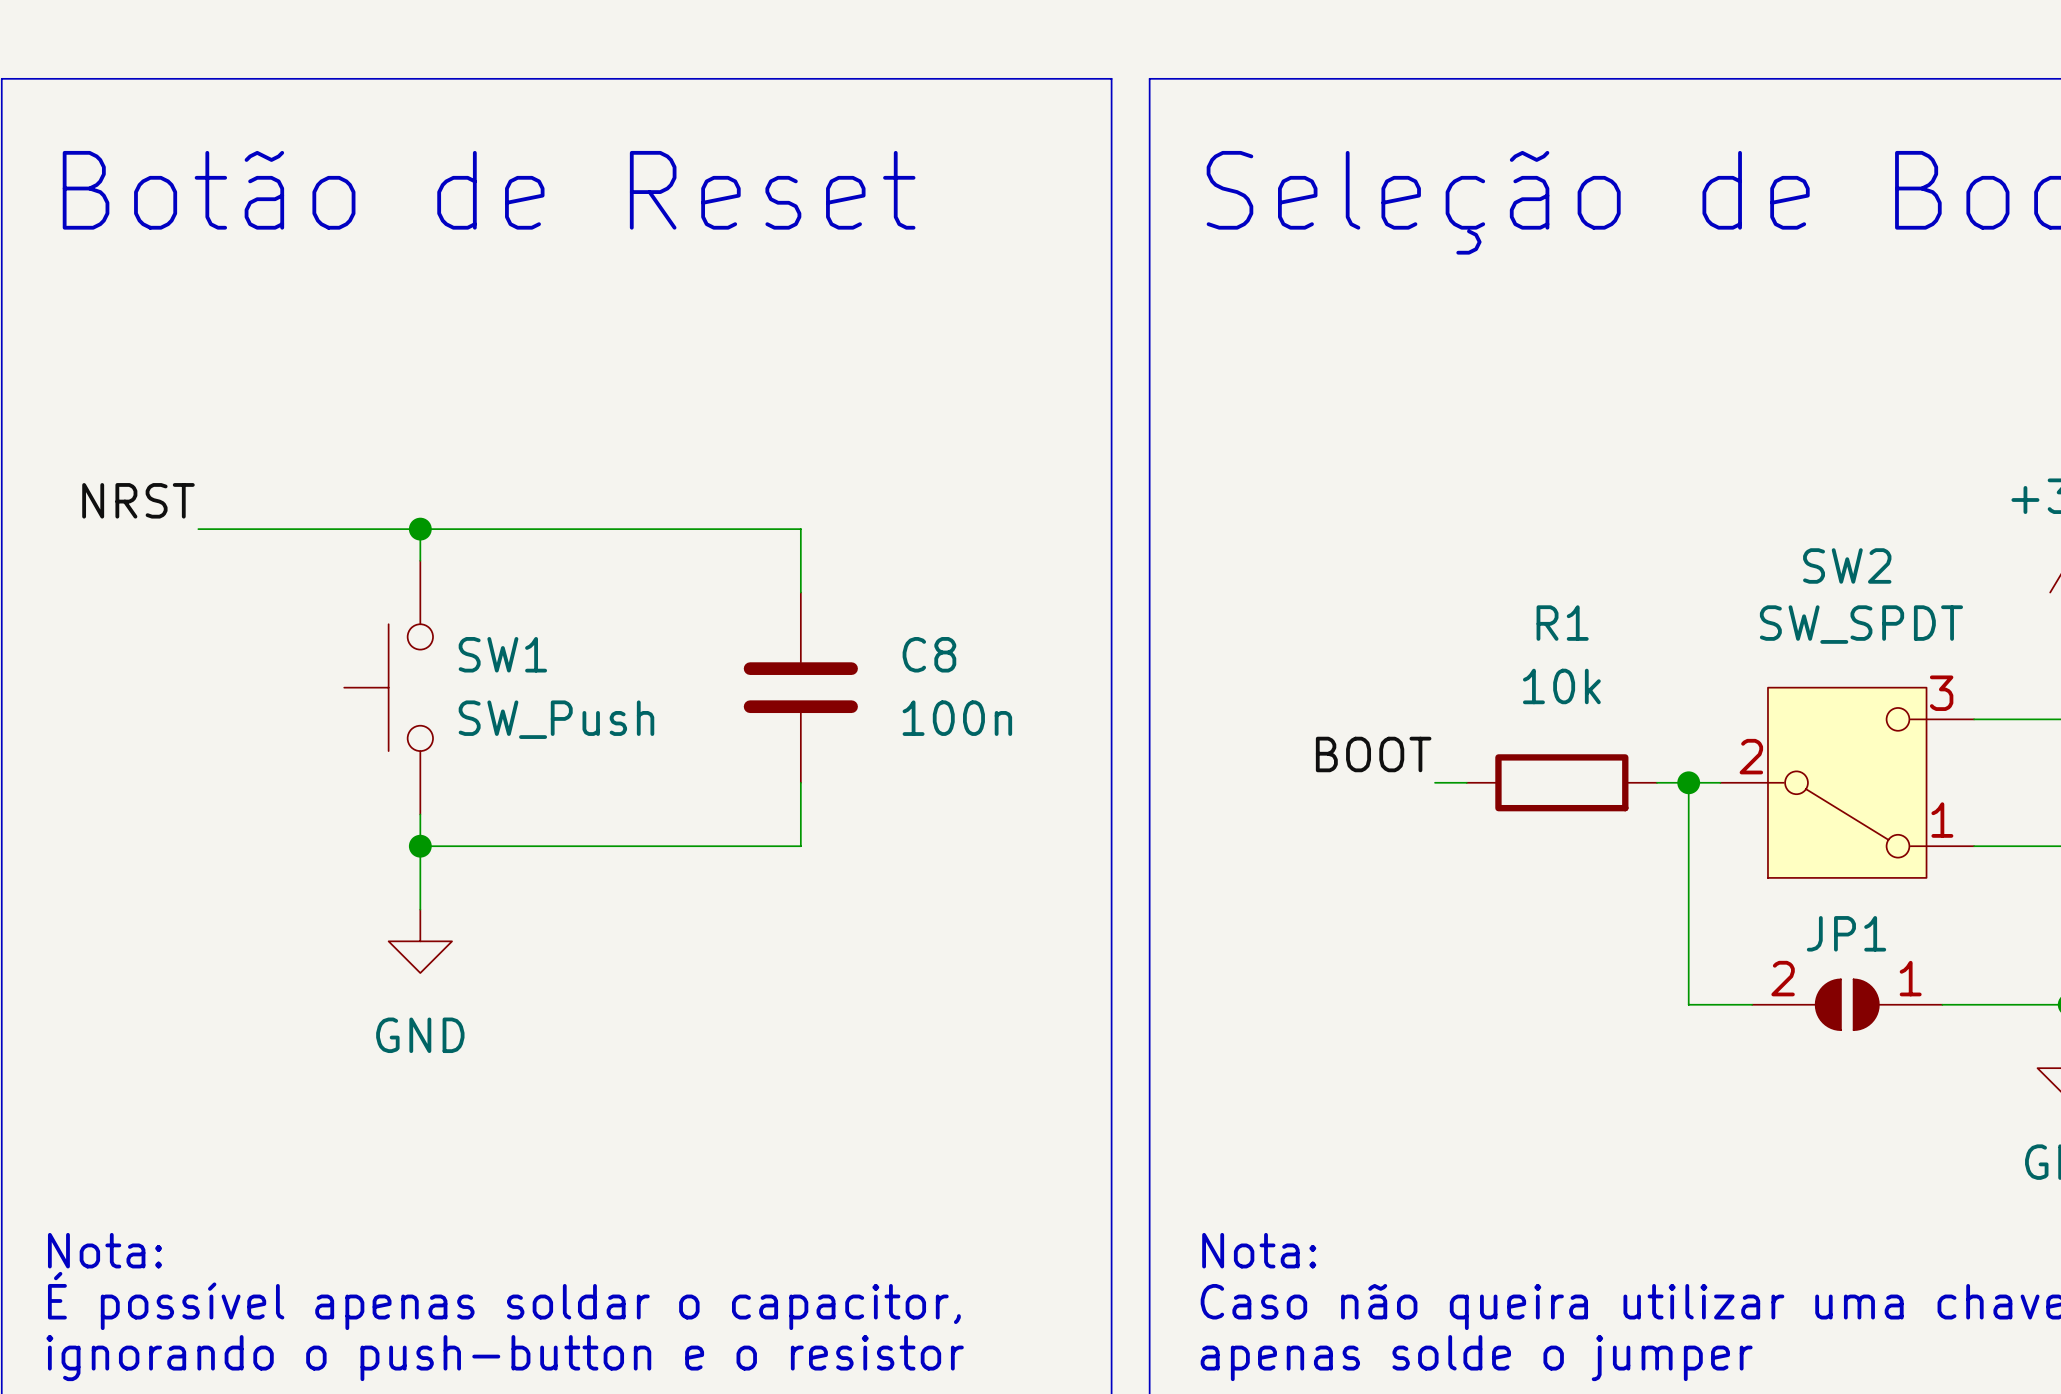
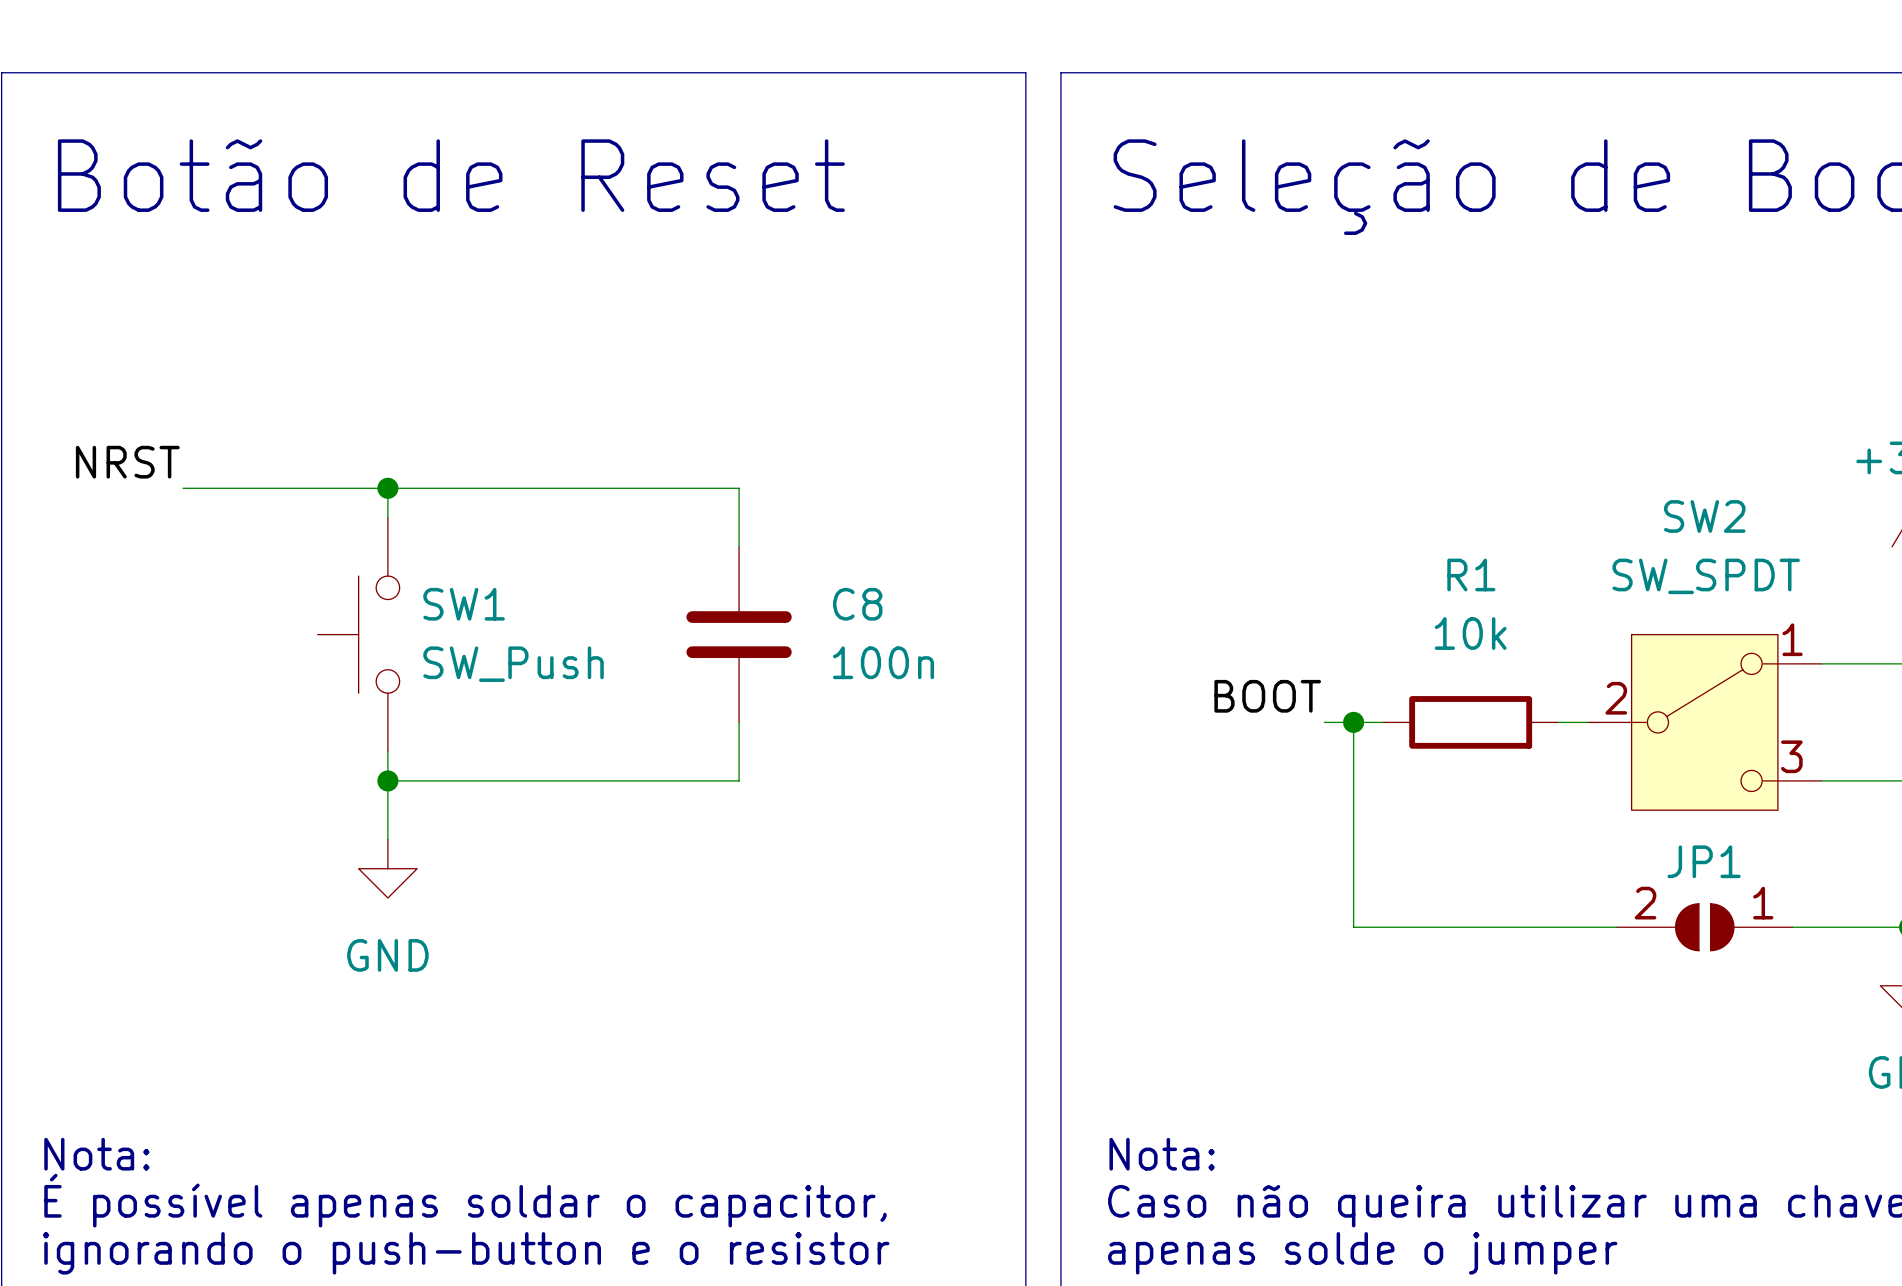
junction: none -> (1353, 722)
R1 position: (1561, 782) -> (1470, 722)
wire: (1657, 782) (1688, 782) (1688, 1004) -> (1382, 722) (1353, 722) (1353, 927) (1558, 927)
junction: (1688, 782) -> none
SW2 flip: as is (1847, 782) -> up-down (1704, 722)

